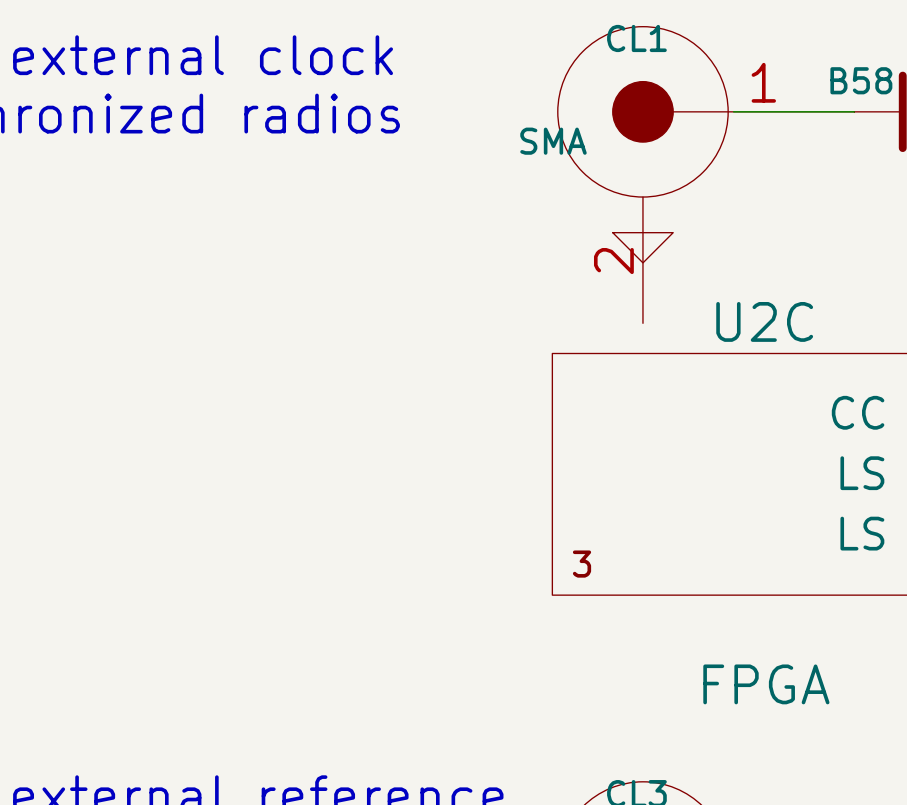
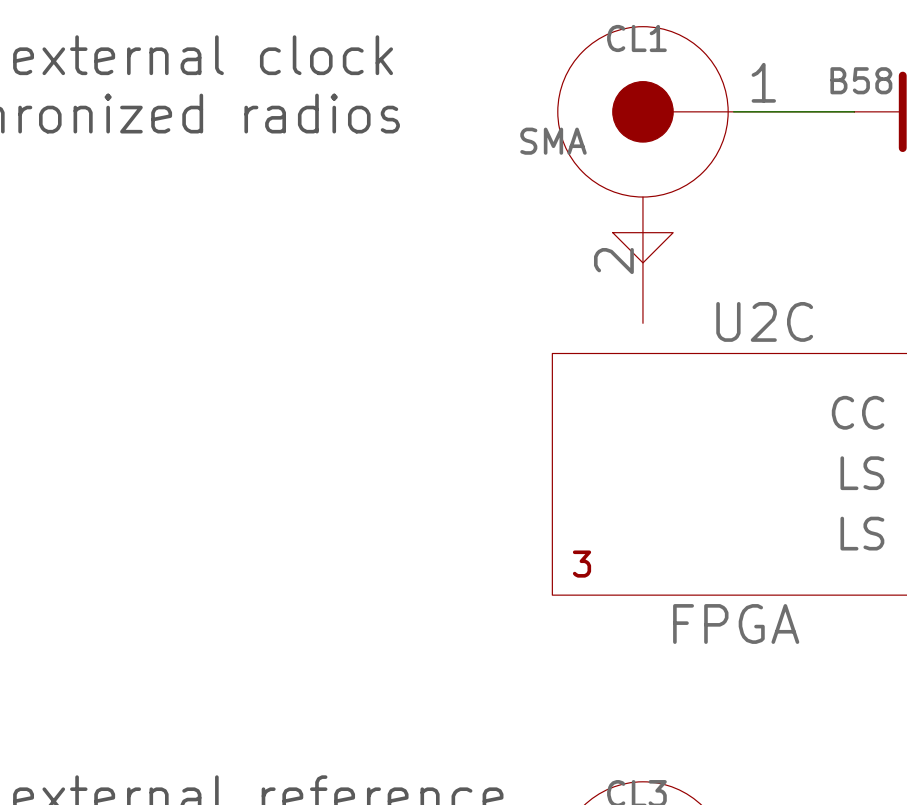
U2C value position: FPGA (766, 684) -> FPGA (736, 623)

